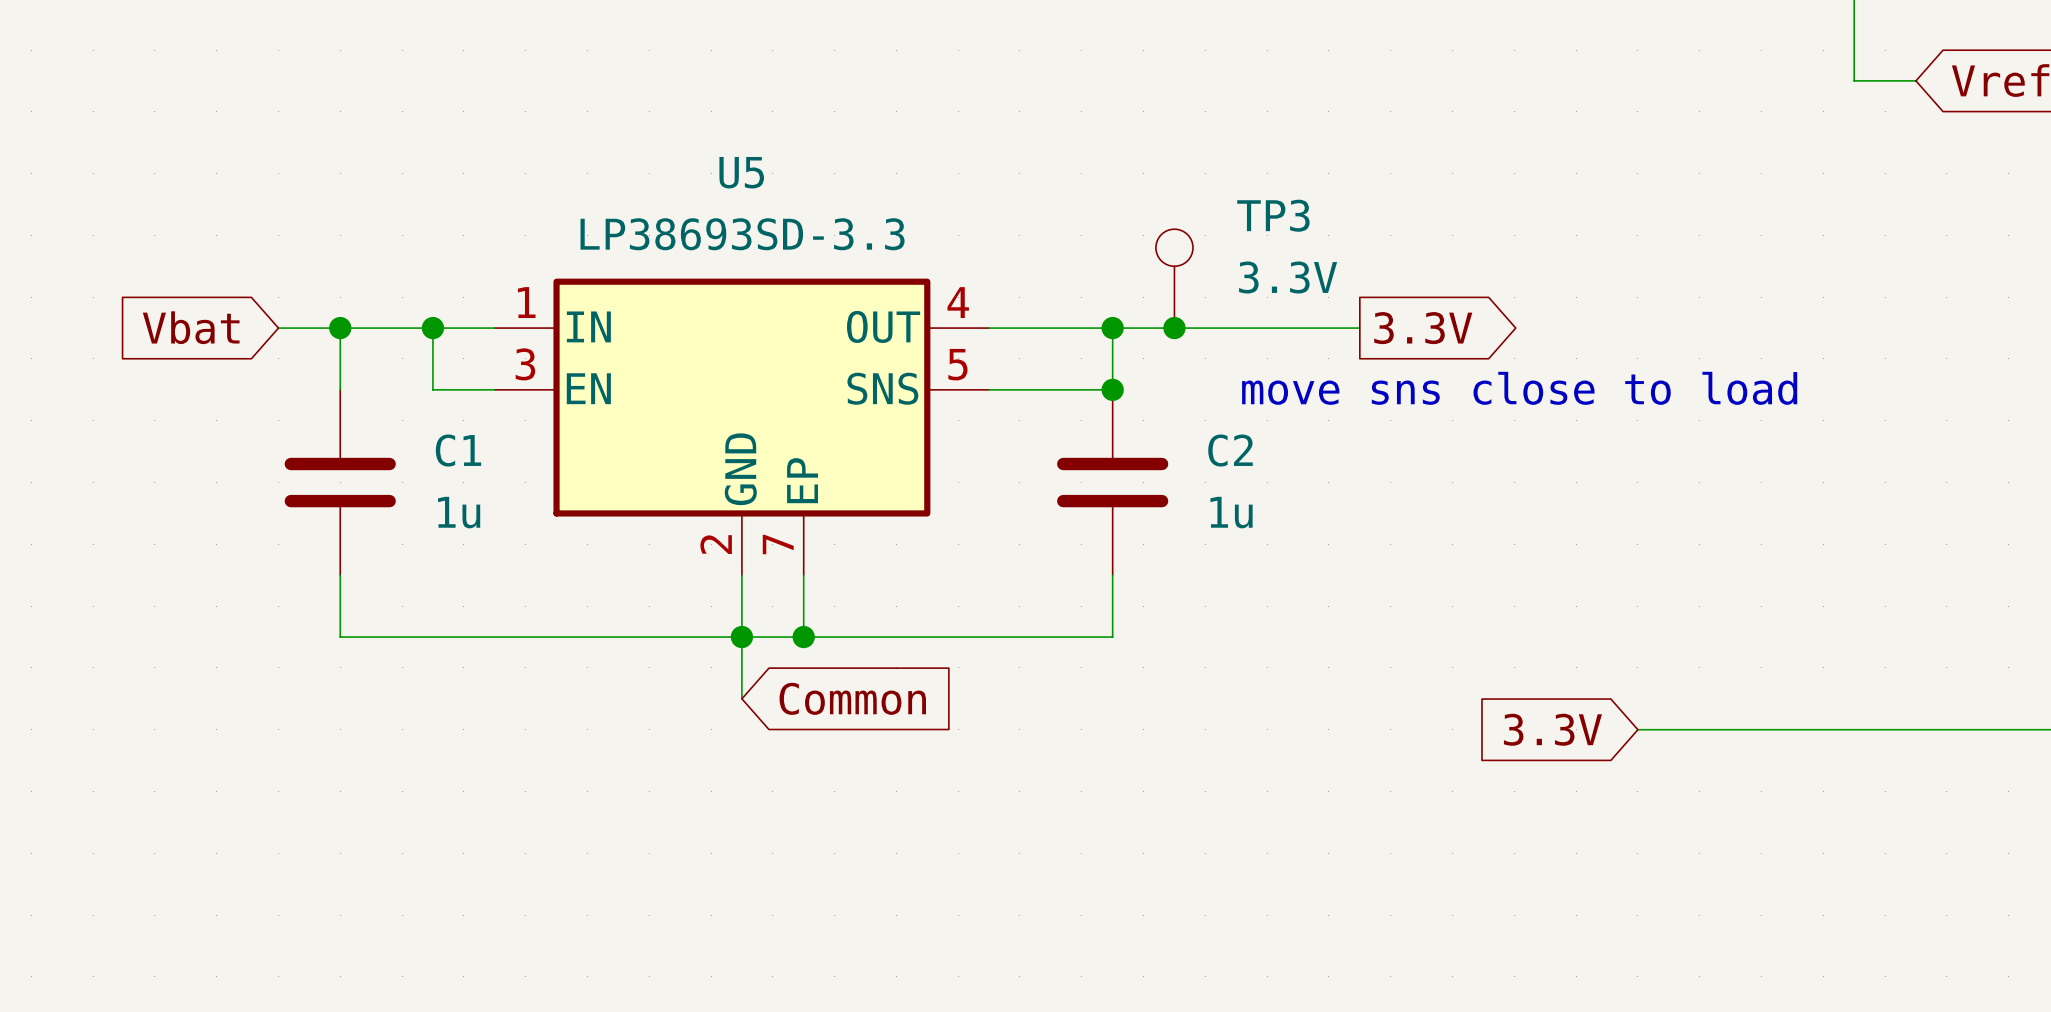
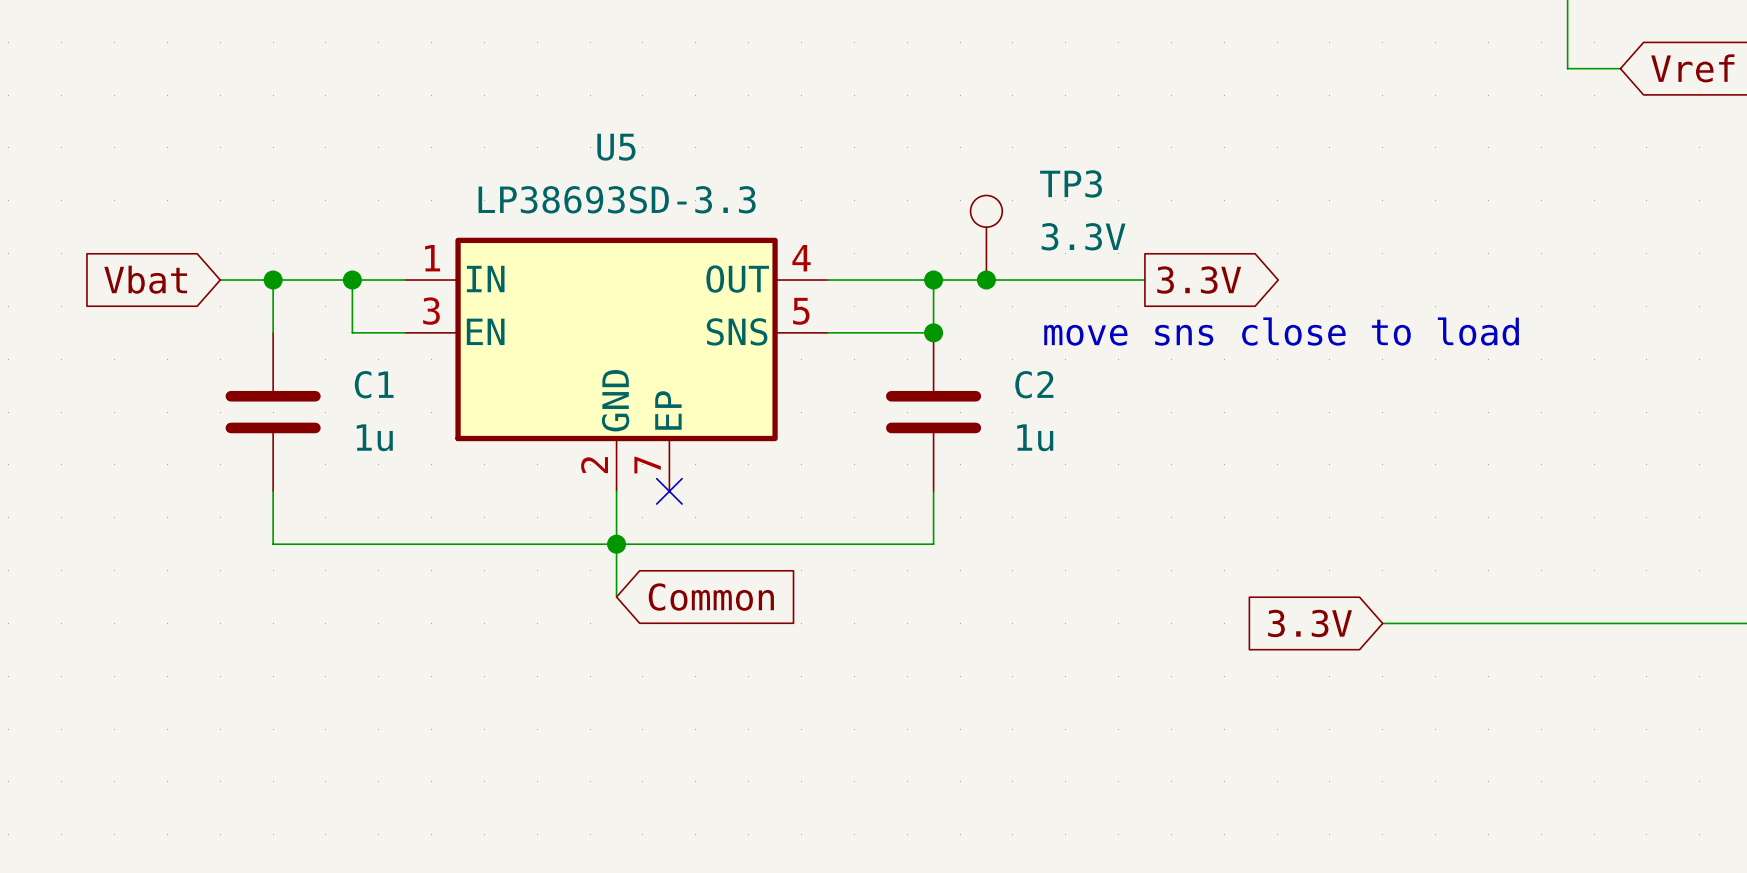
wire: (803, 575) (803, 637) -> none
no-connect mark: none -> (669, 491)
junction: (803, 637) -> none

